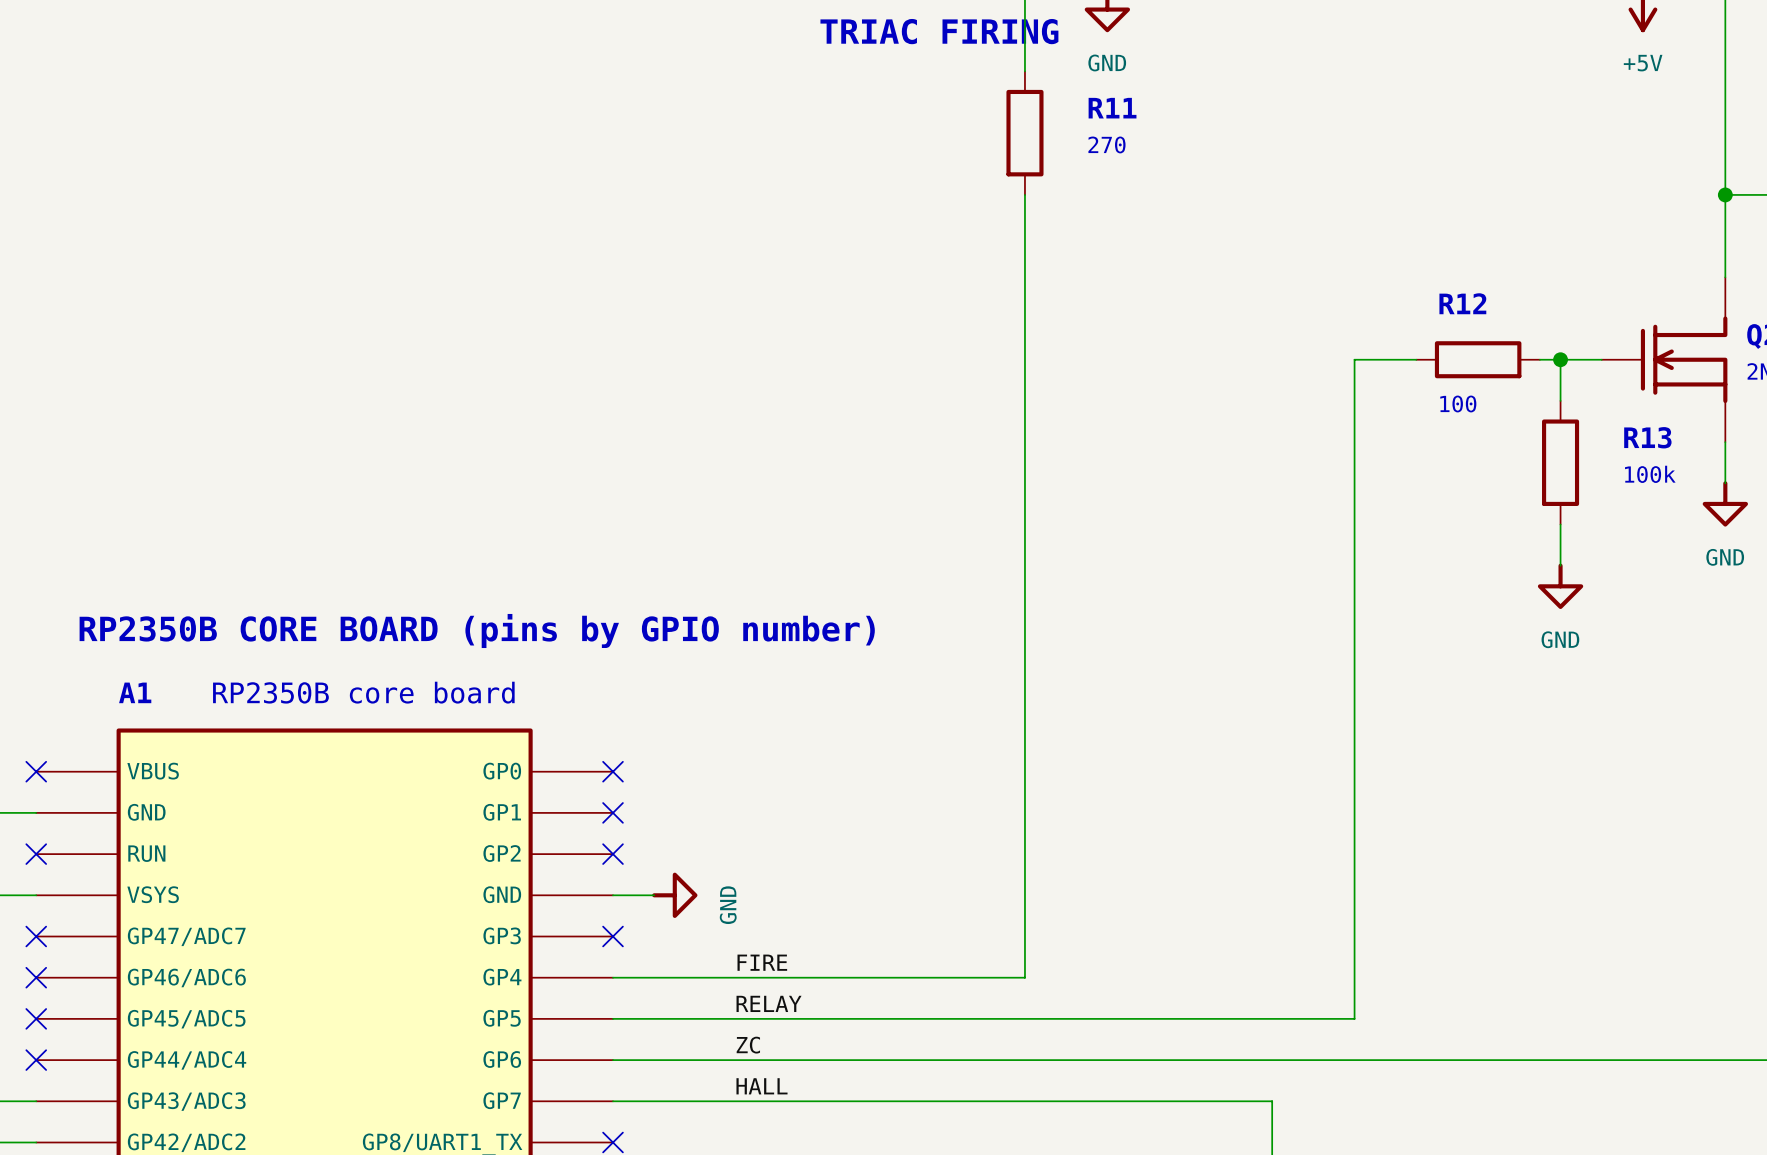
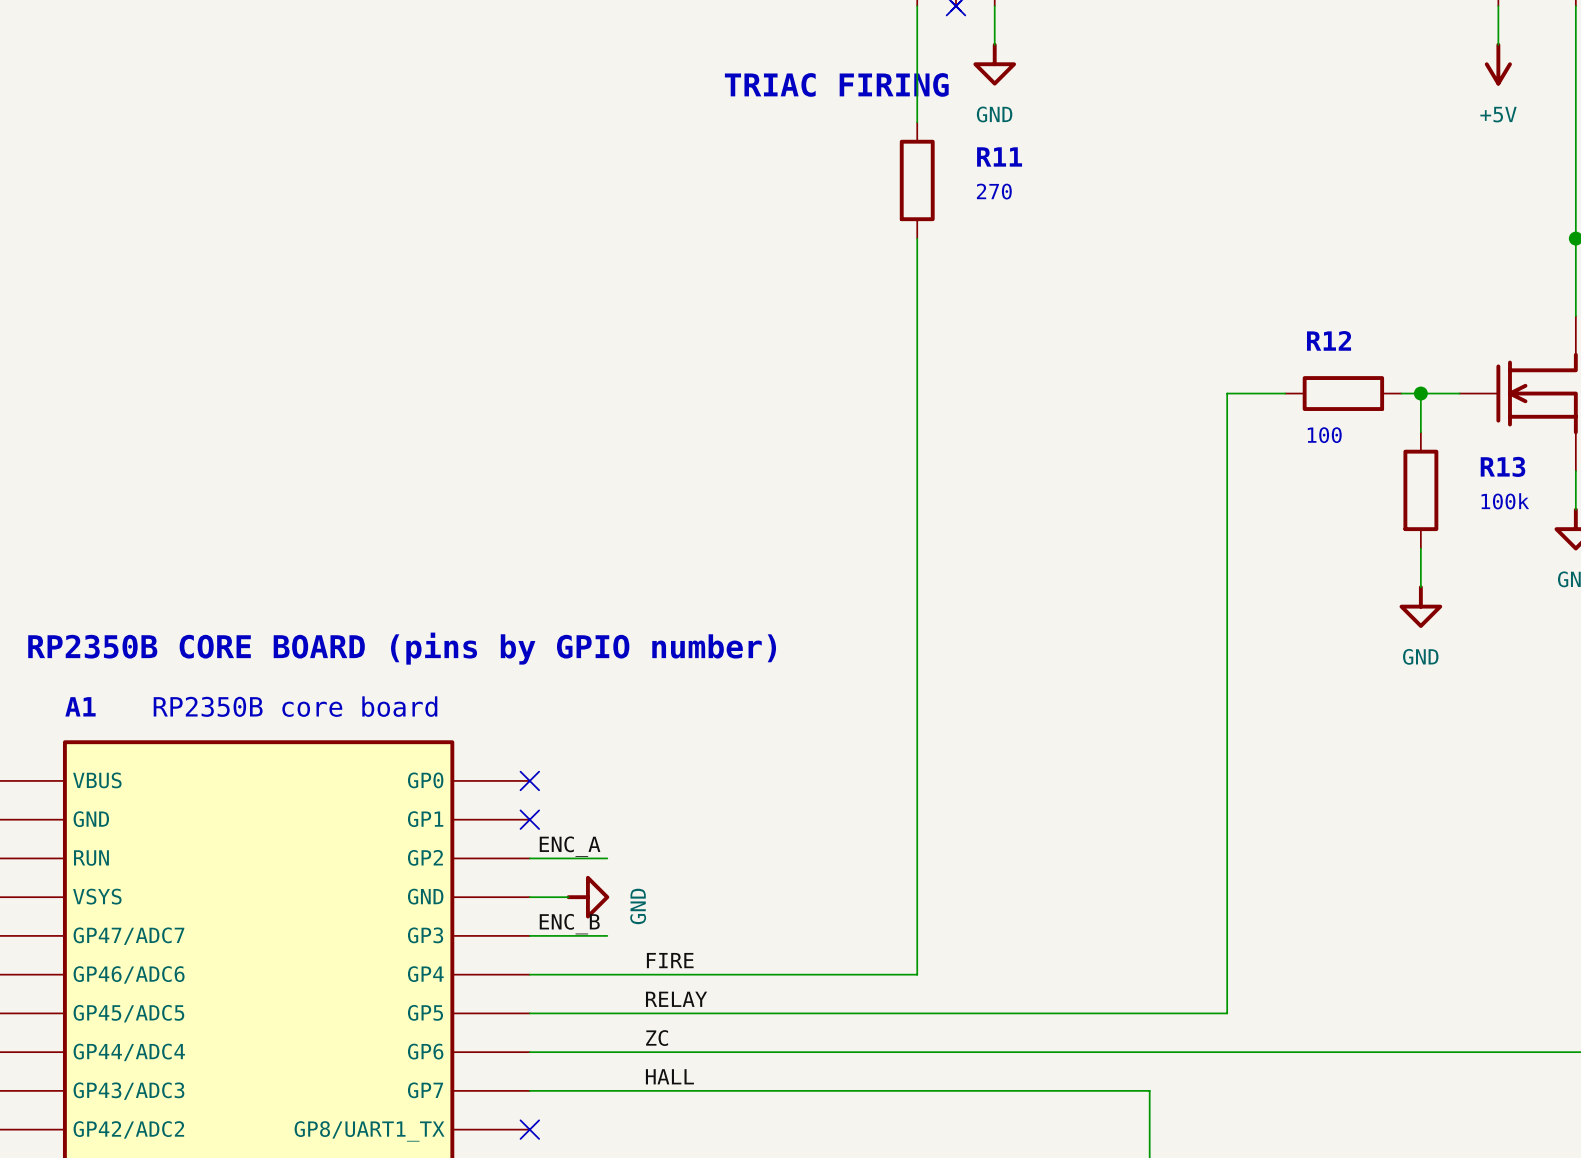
label: none -> ENC_A (570, 846)
wire: none -> (529, 858) (607, 858)
no-connect mark: (613, 854) -> none
label: none -> ENC_B (569, 924)
wire: none -> (529, 935) (607, 935)
no-connect mark: (613, 936) -> none

